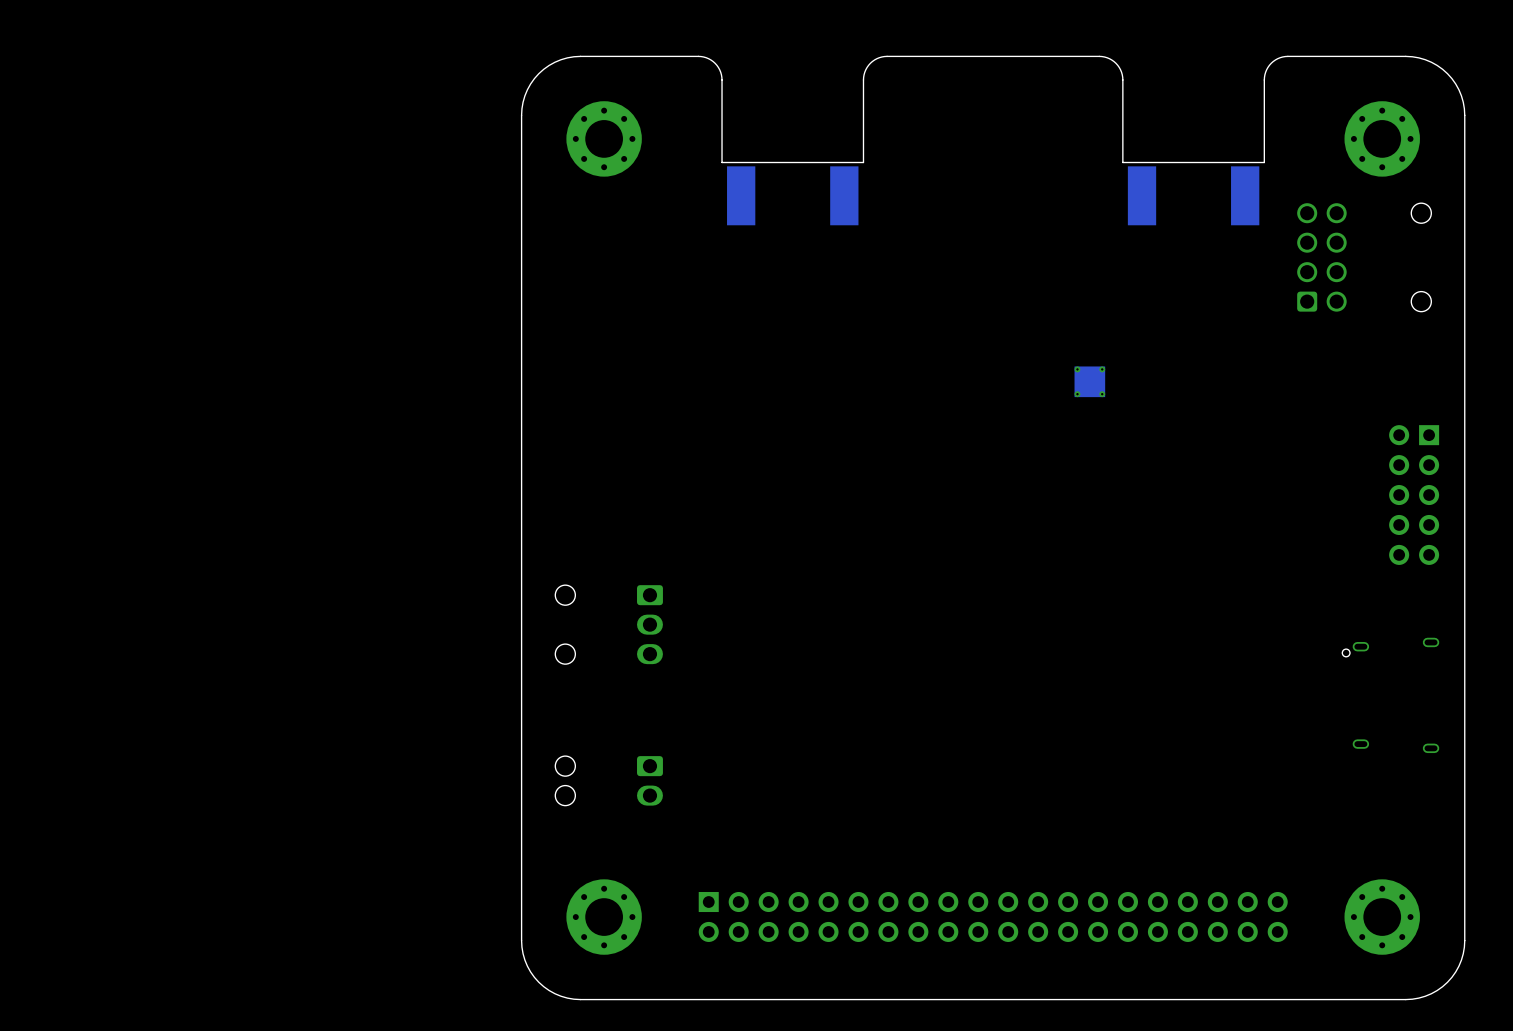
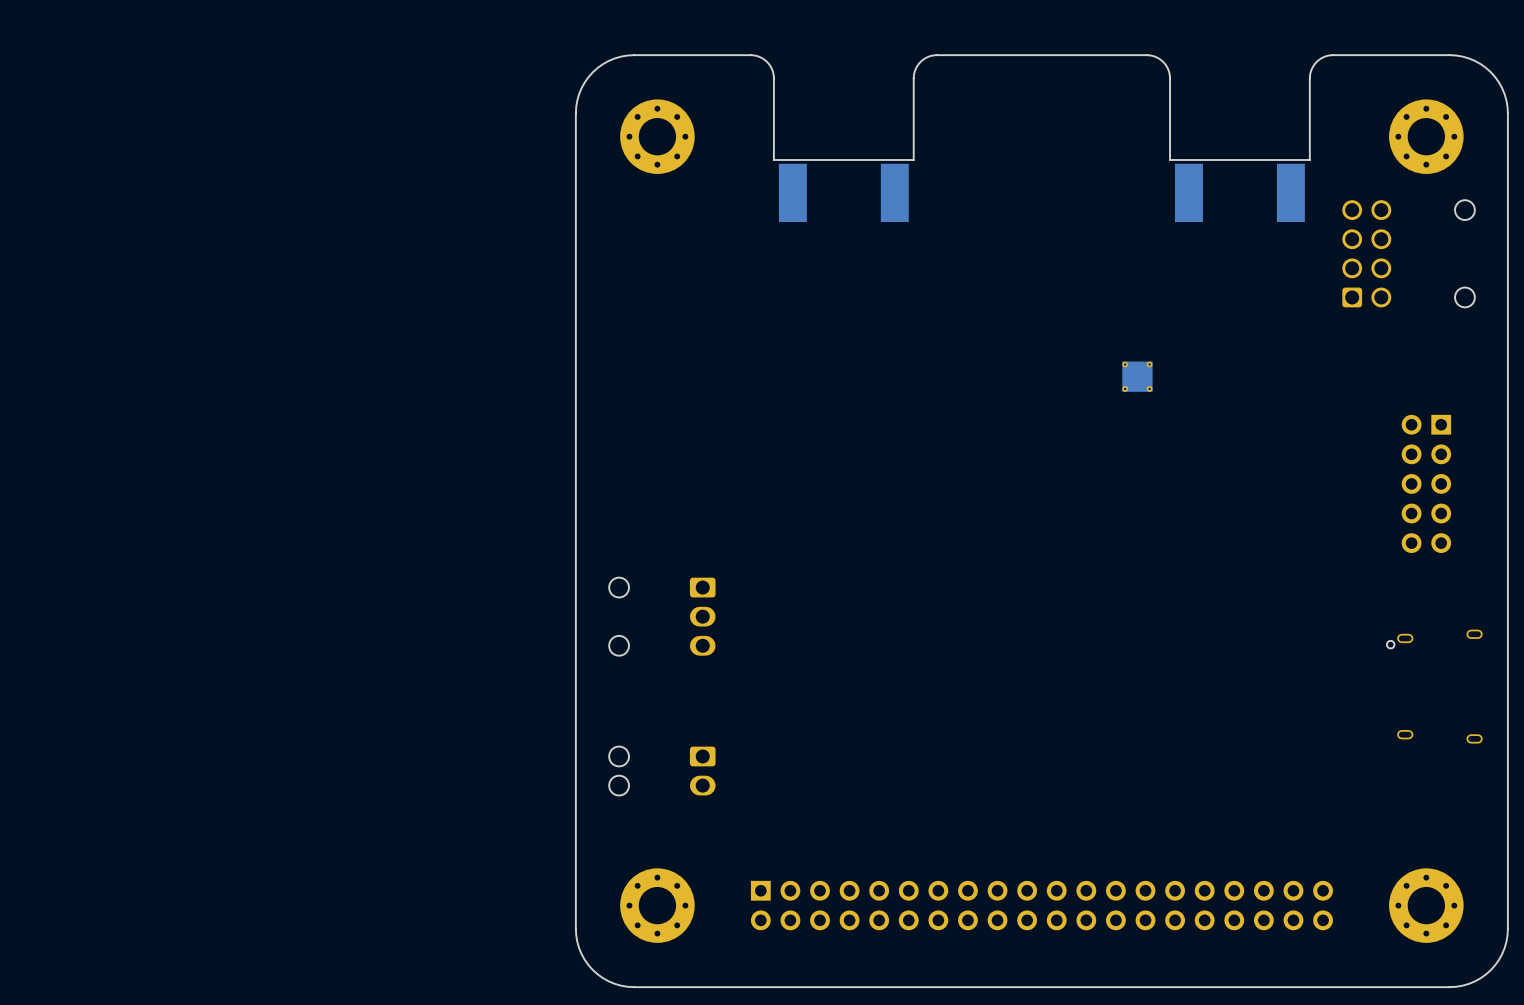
part position: (1414, 495) -> (1426, 483)

